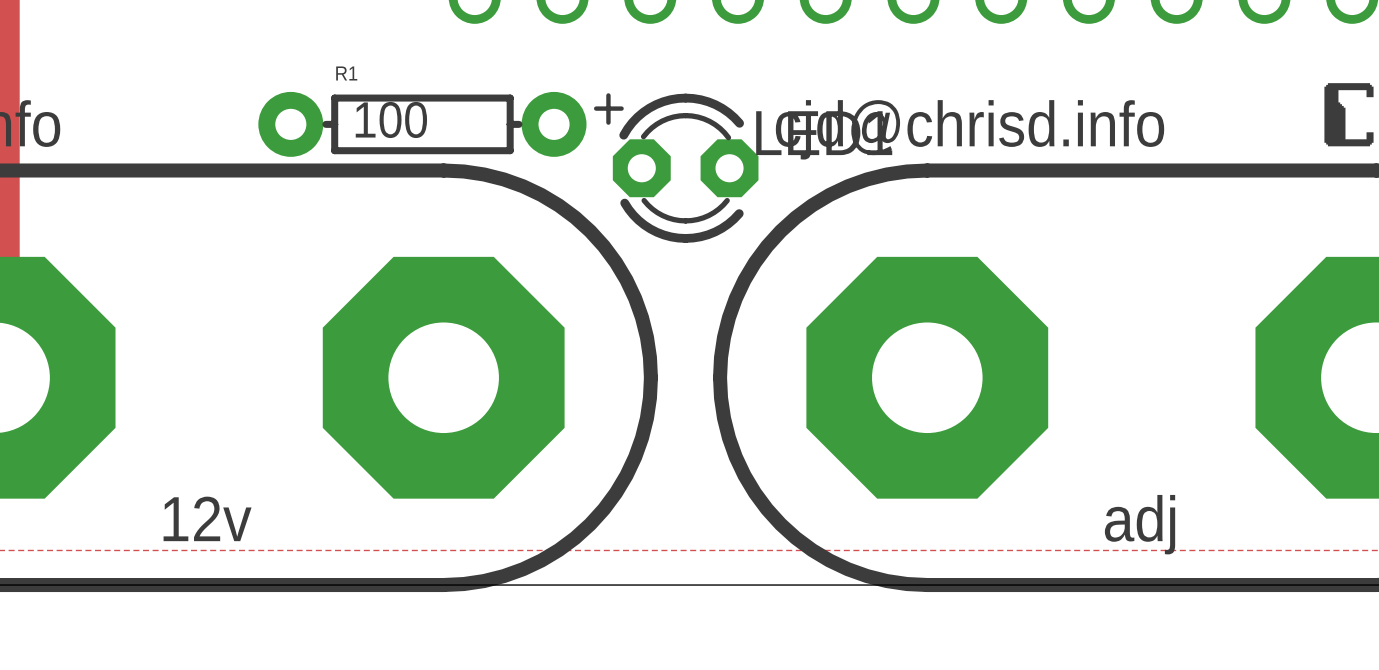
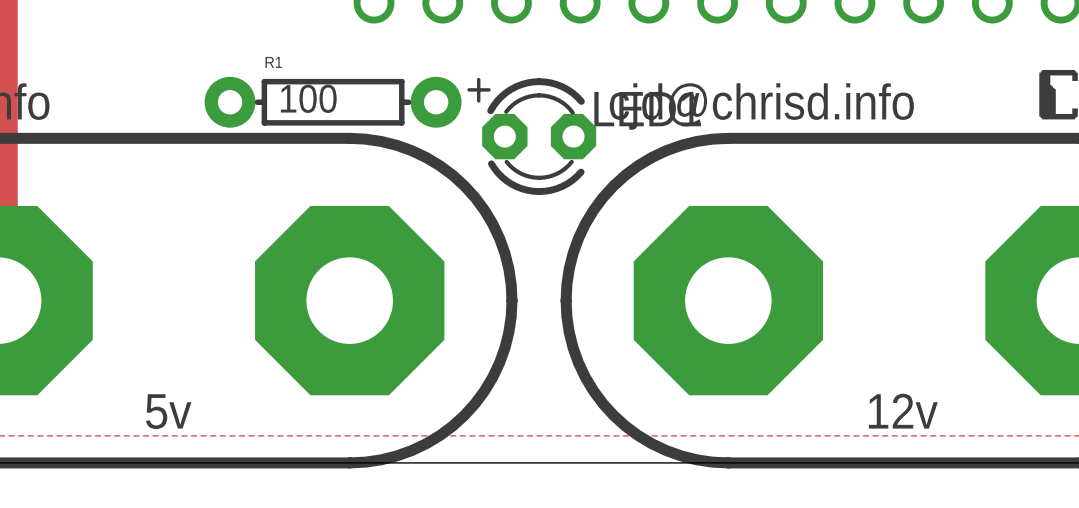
text: 12v (207, 518) -> 5v (168, 411)
text: adj (1140, 524) -> 12v (903, 411)

